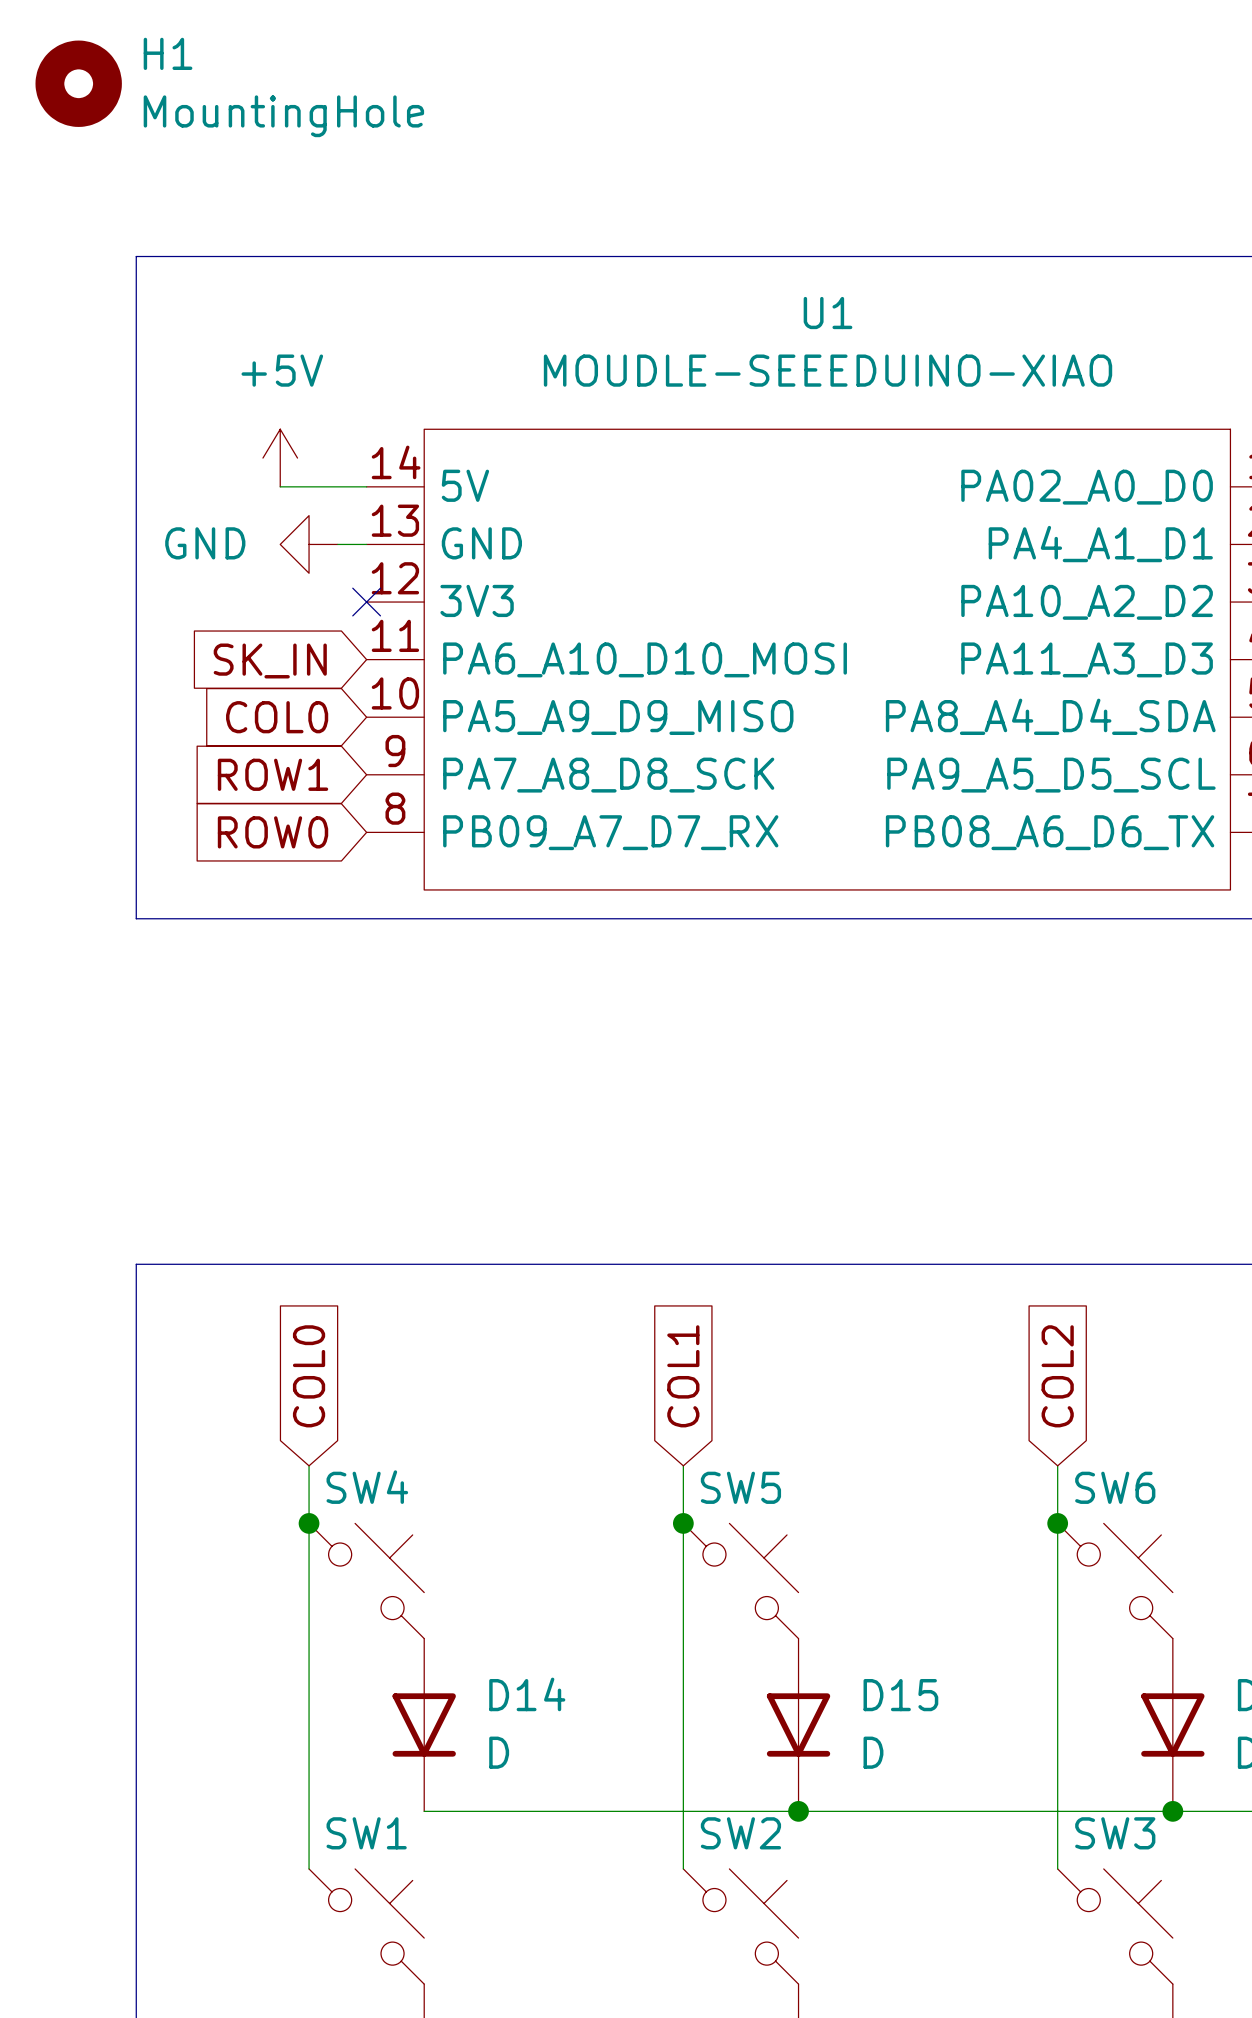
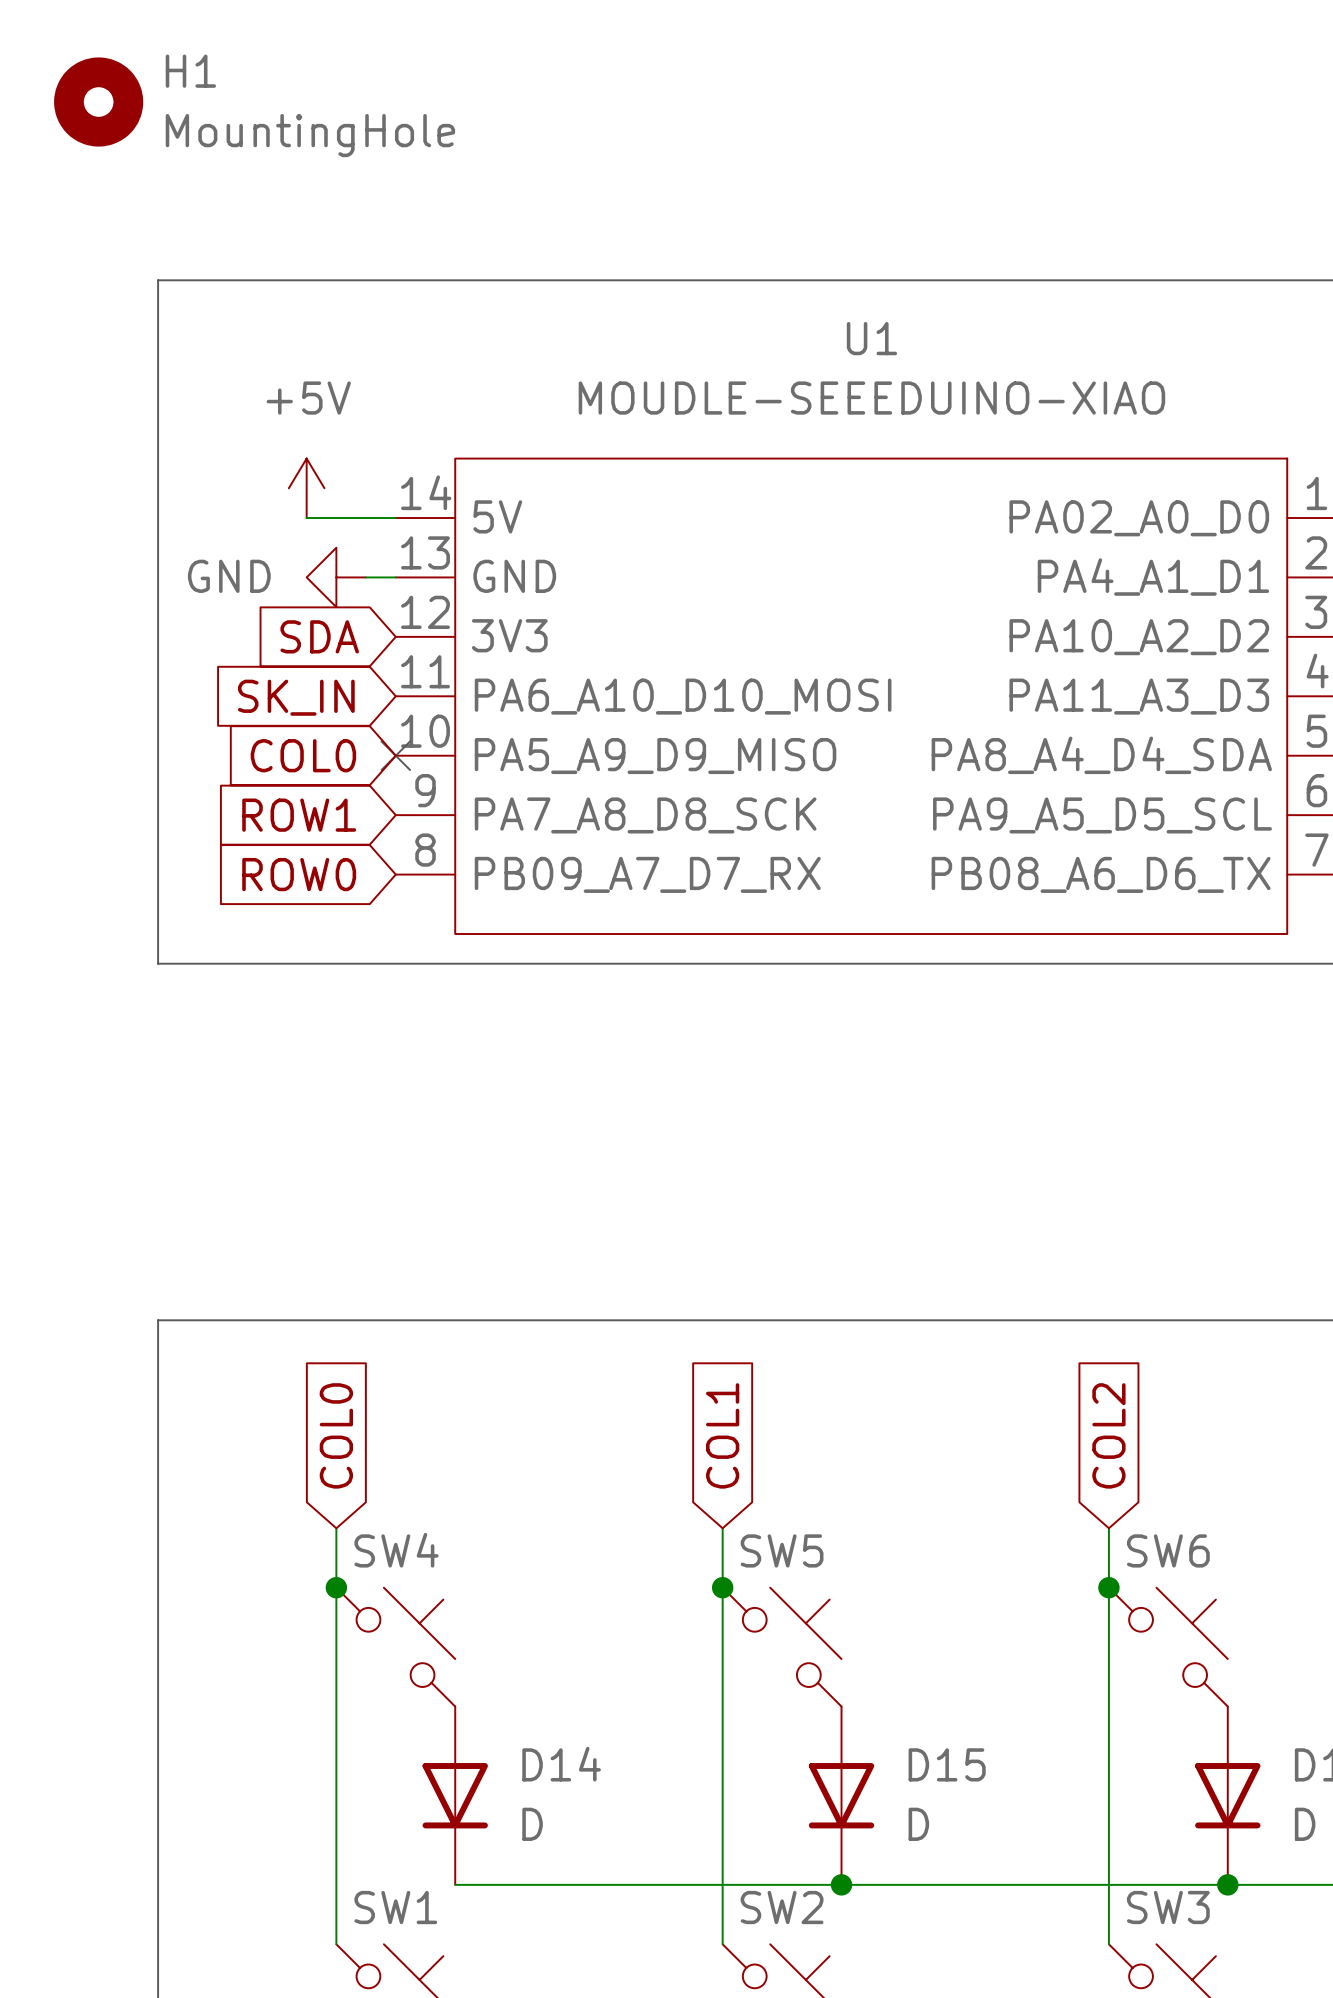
global label: none -> SDA (319, 636)
no-connect mark position: (366, 602) -> (395, 755)

